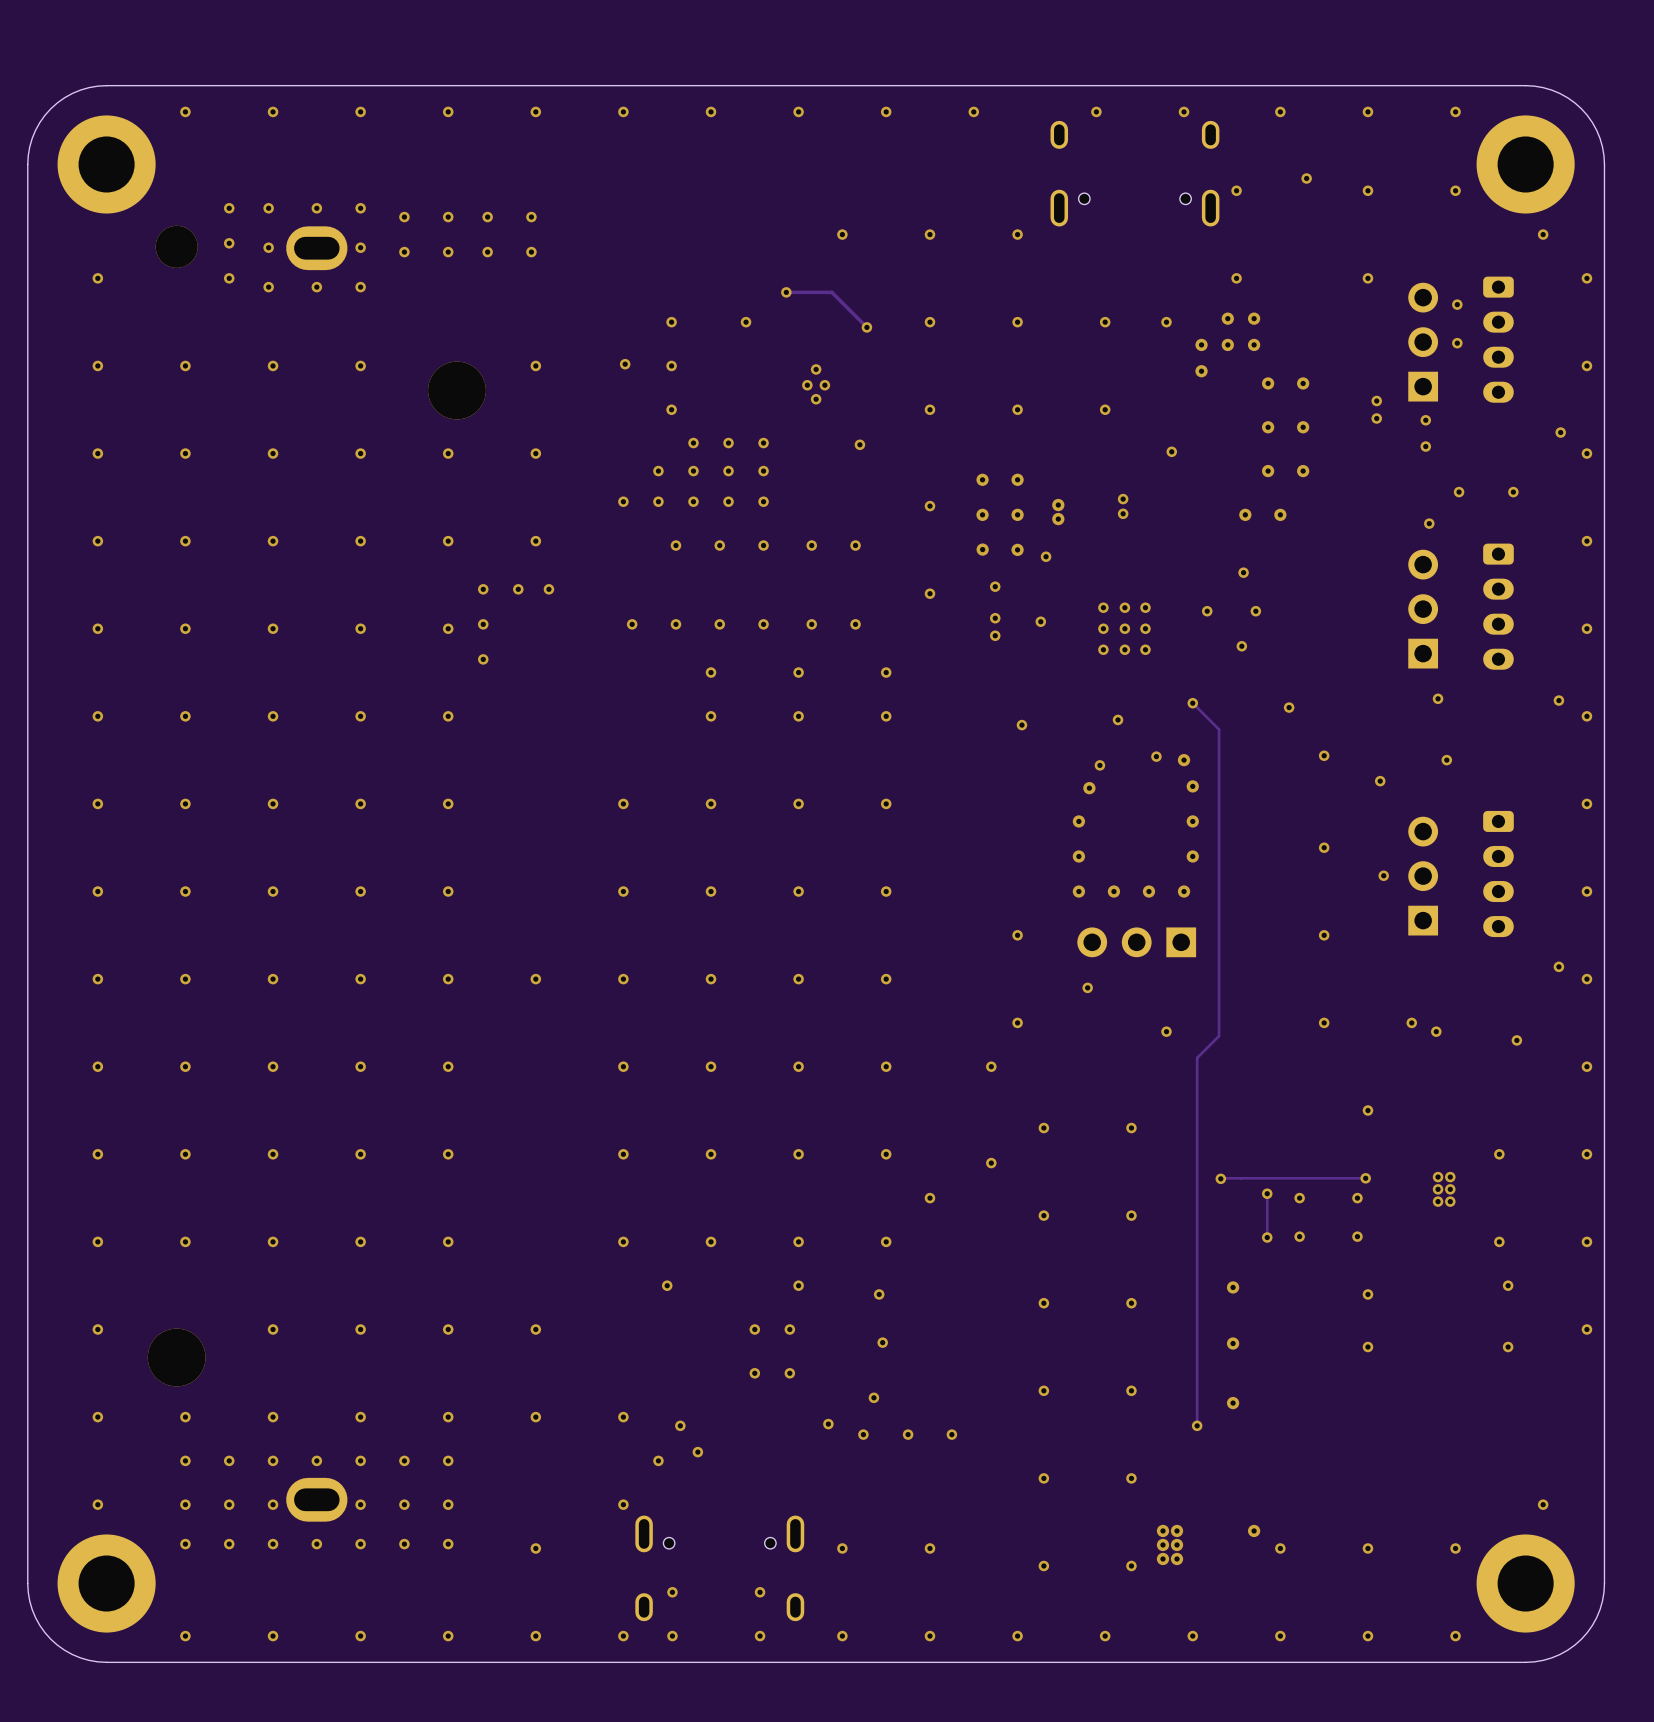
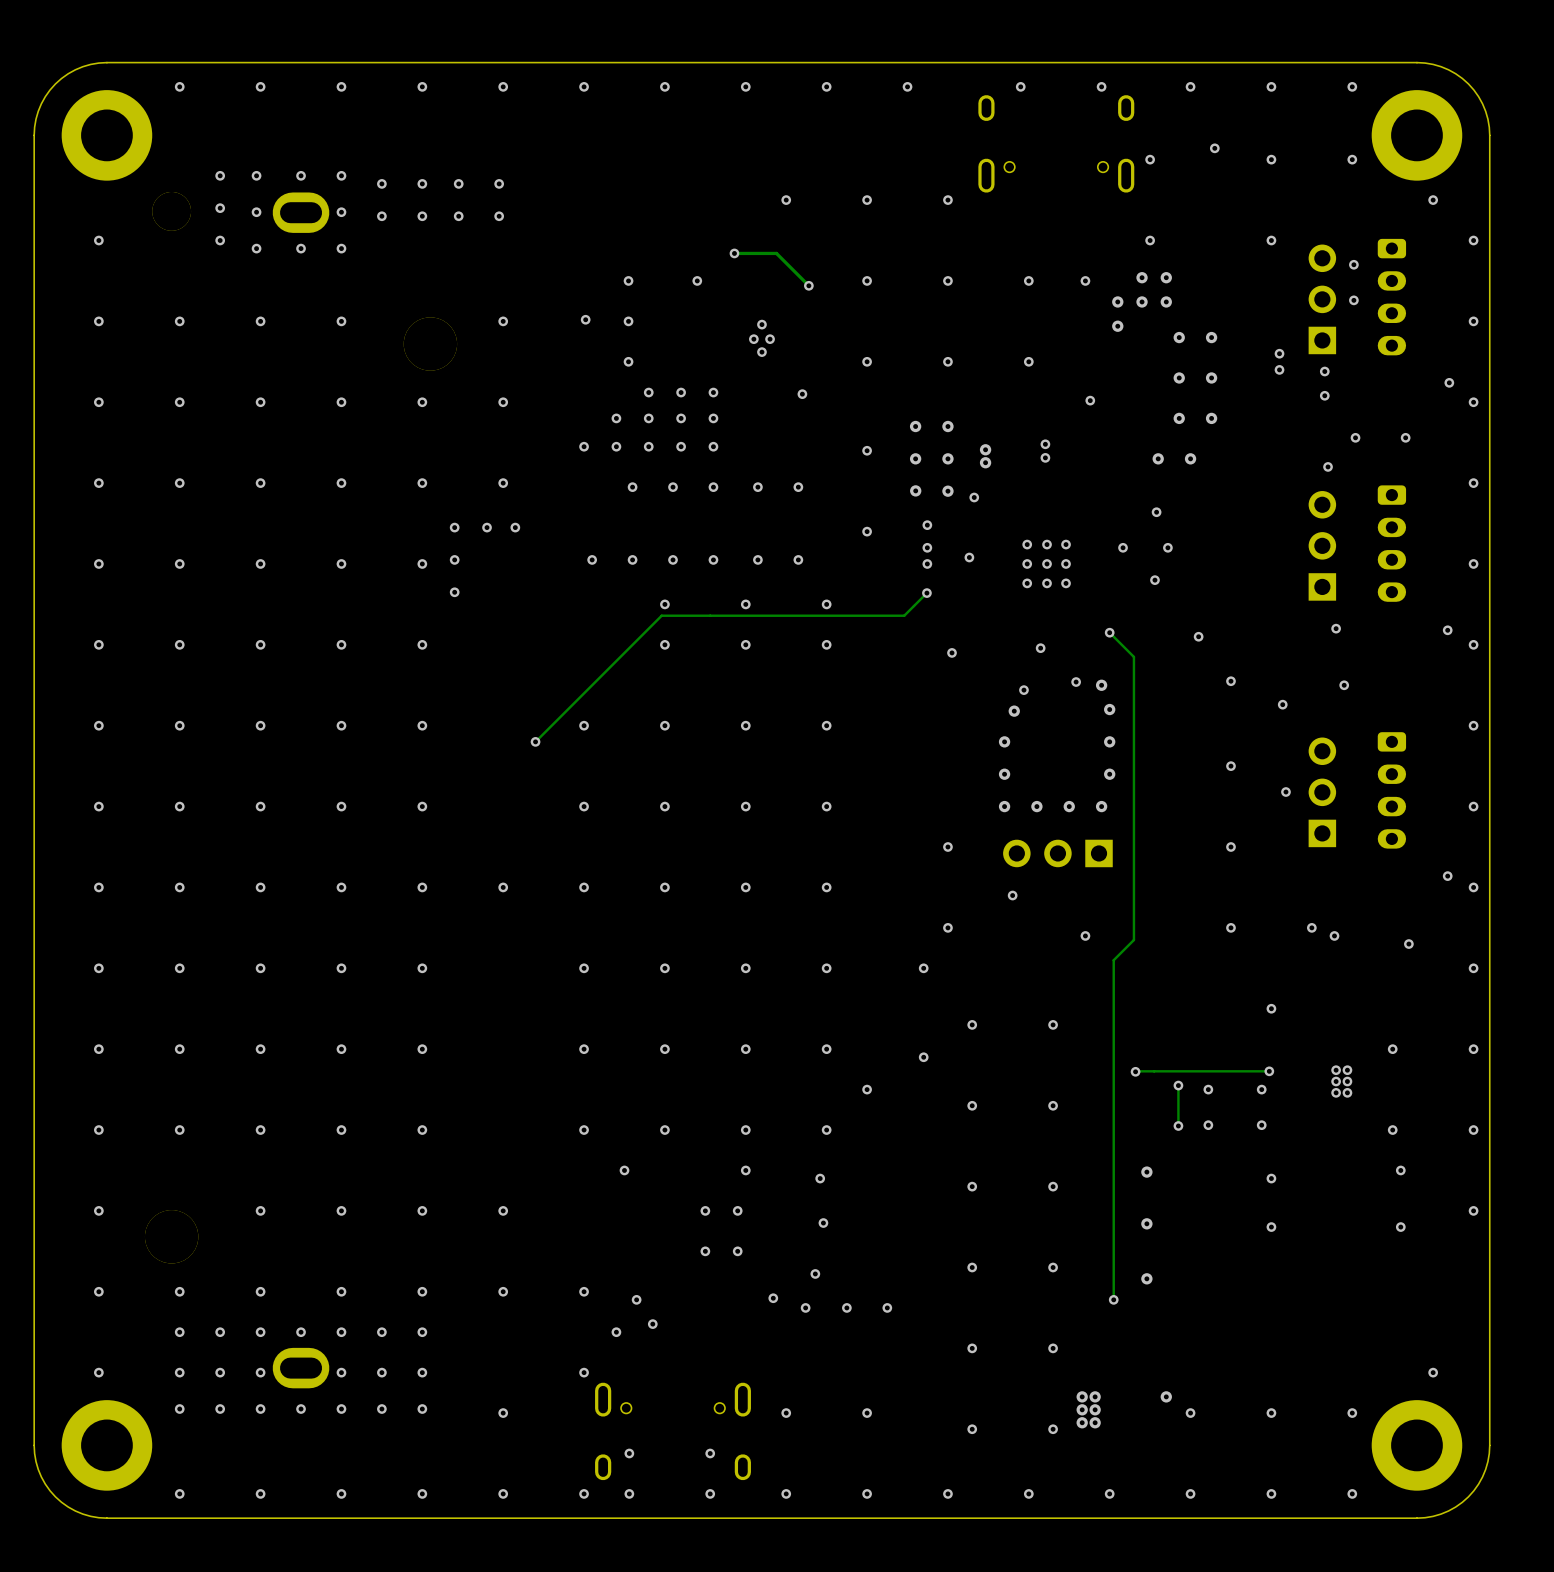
via: none -> (927, 547)
via: (995, 618) -> none
via: none -> (927, 563)
via: (995, 635) -> none
track: none -> (926, 593) (904, 615) (661, 615) (535, 741)
via: none -> (926, 593)
via: none -> (535, 741)

